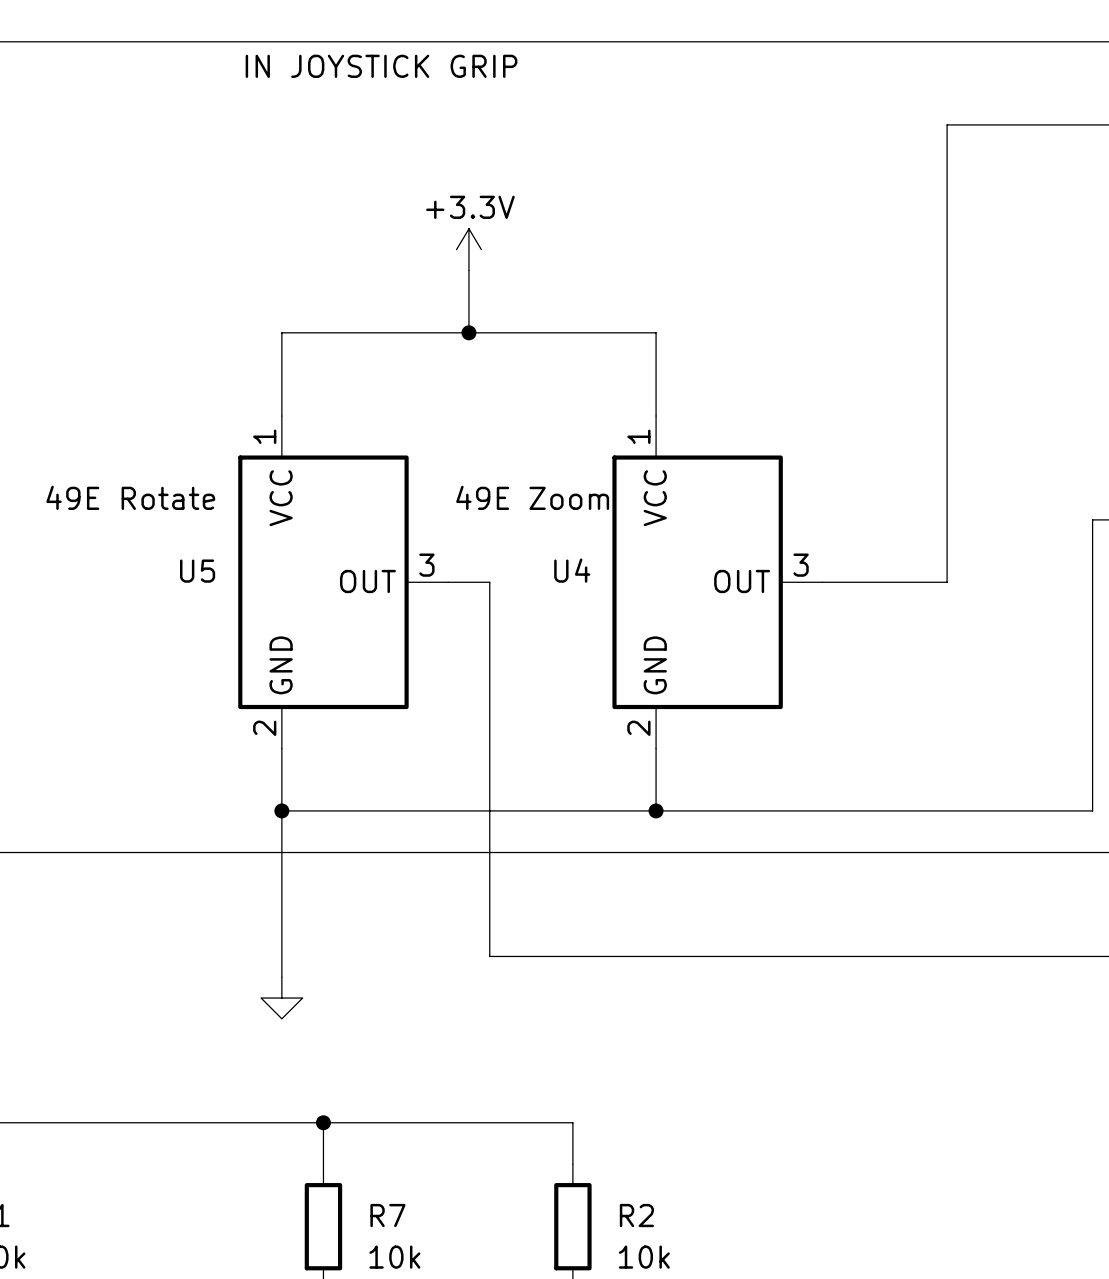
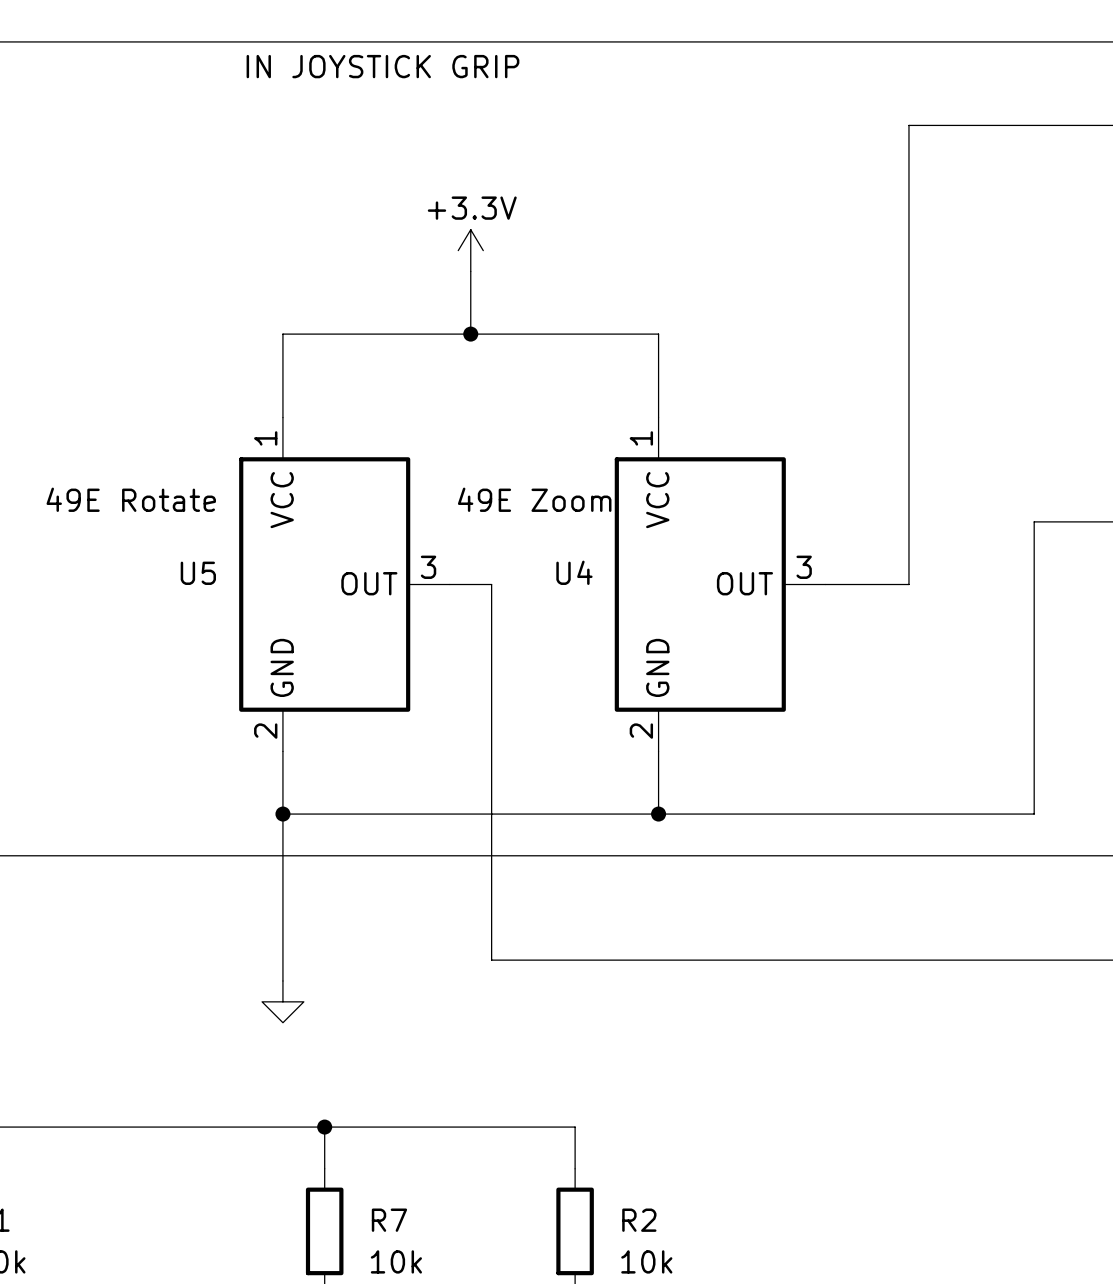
wire: (947, 124) (947, 582) (905, 582) -> (950, 125) (908, 125) (908, 584)
wire: (1092, 519) (1092, 810) (1030, 810) -> (1096, 521) (1034, 521) (1034, 814)

